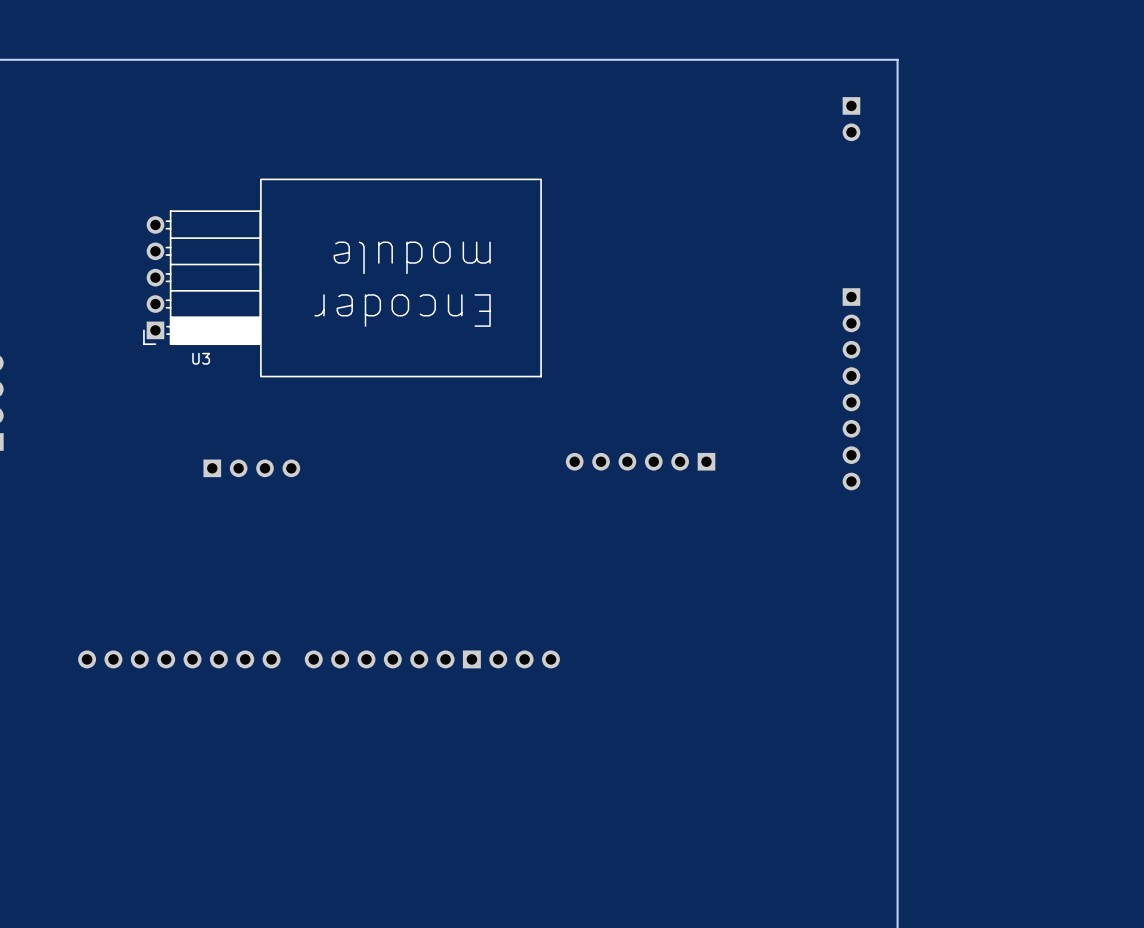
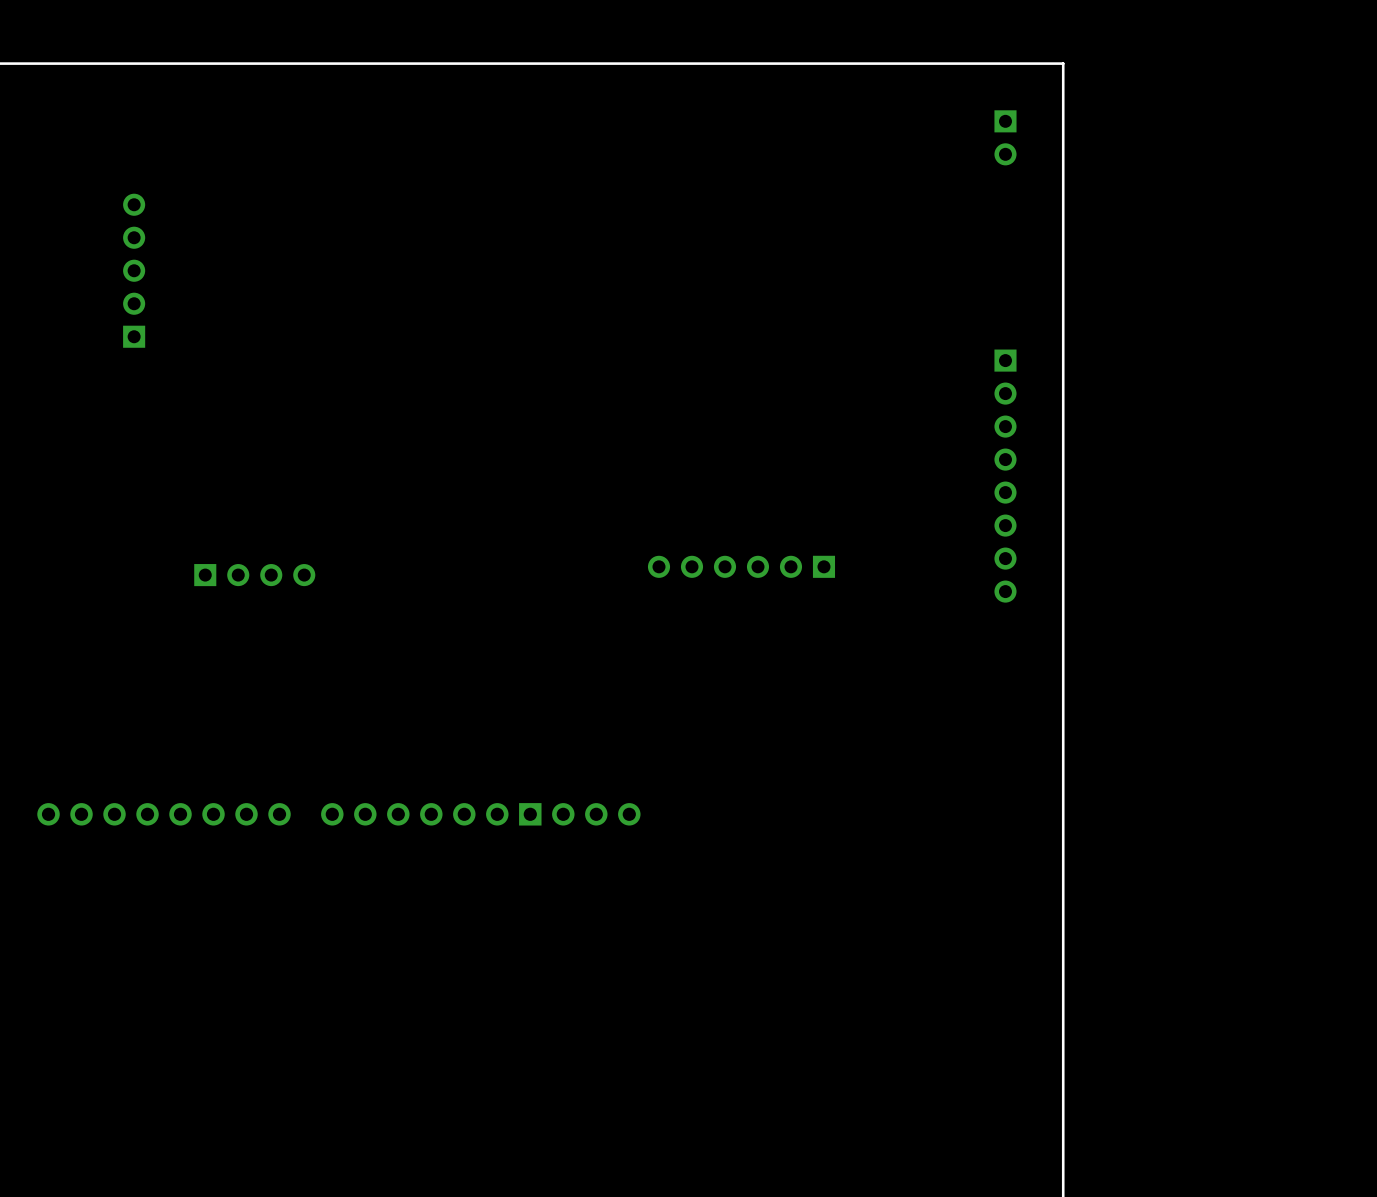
part: none -> (134, 270)
U3: (342, 277) -> none

